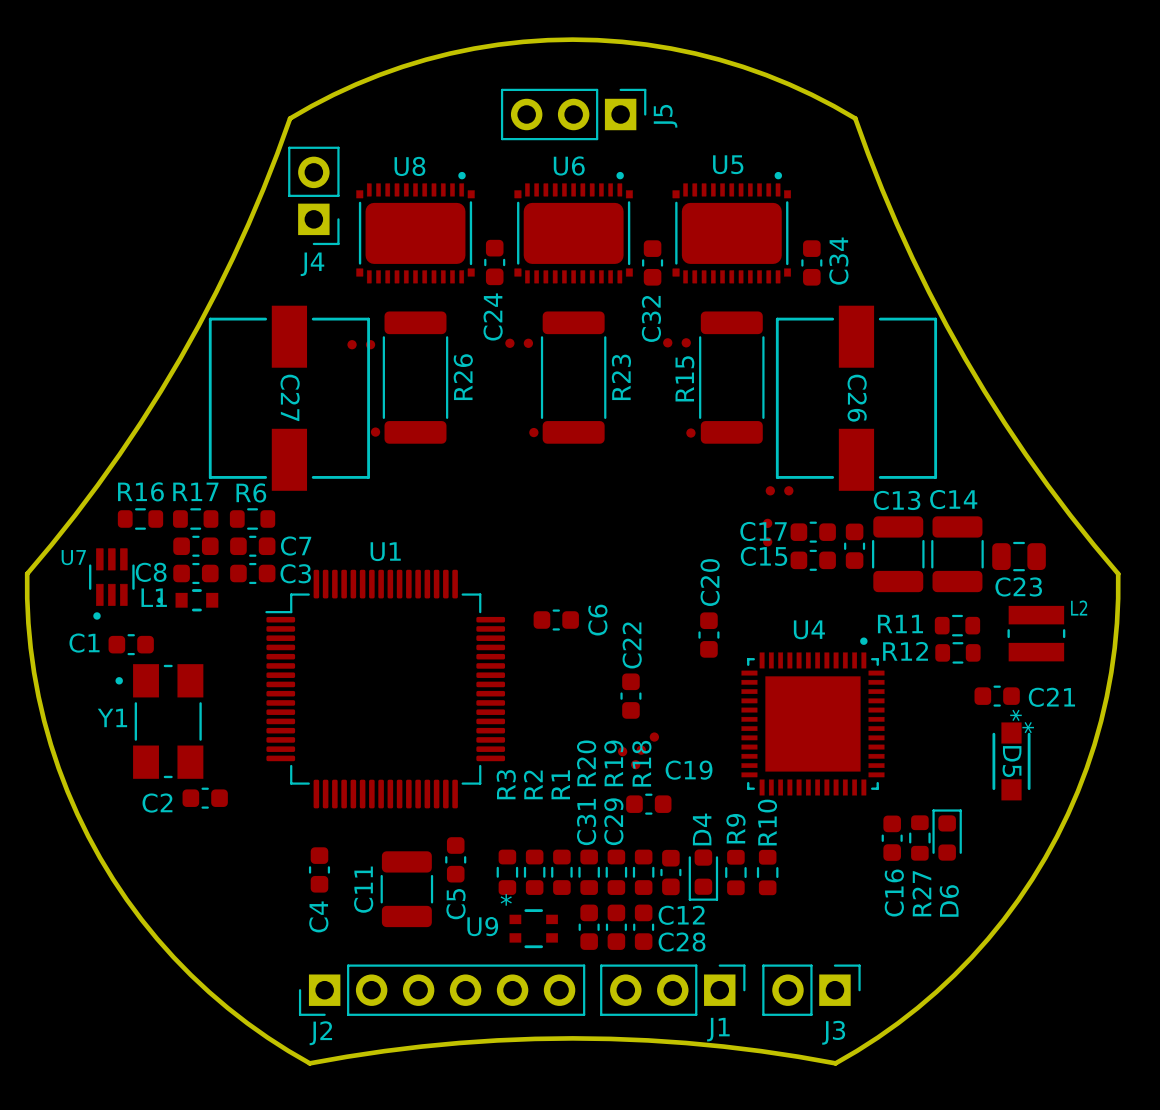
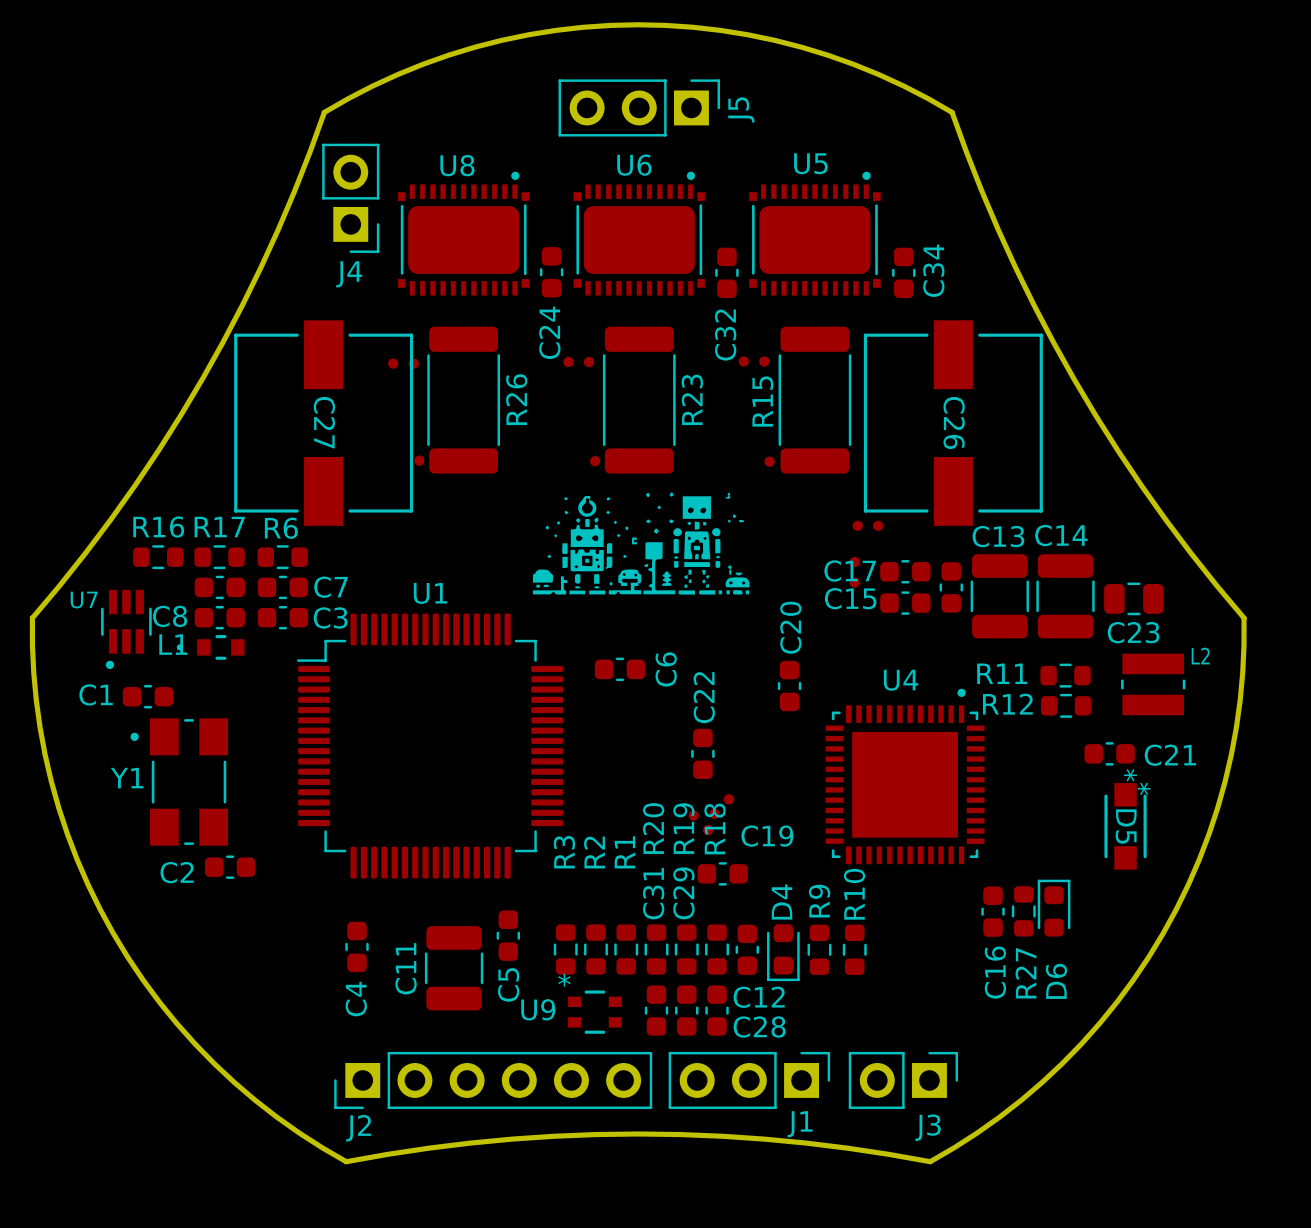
drawing: none -> [532, 484, 750, 595]

